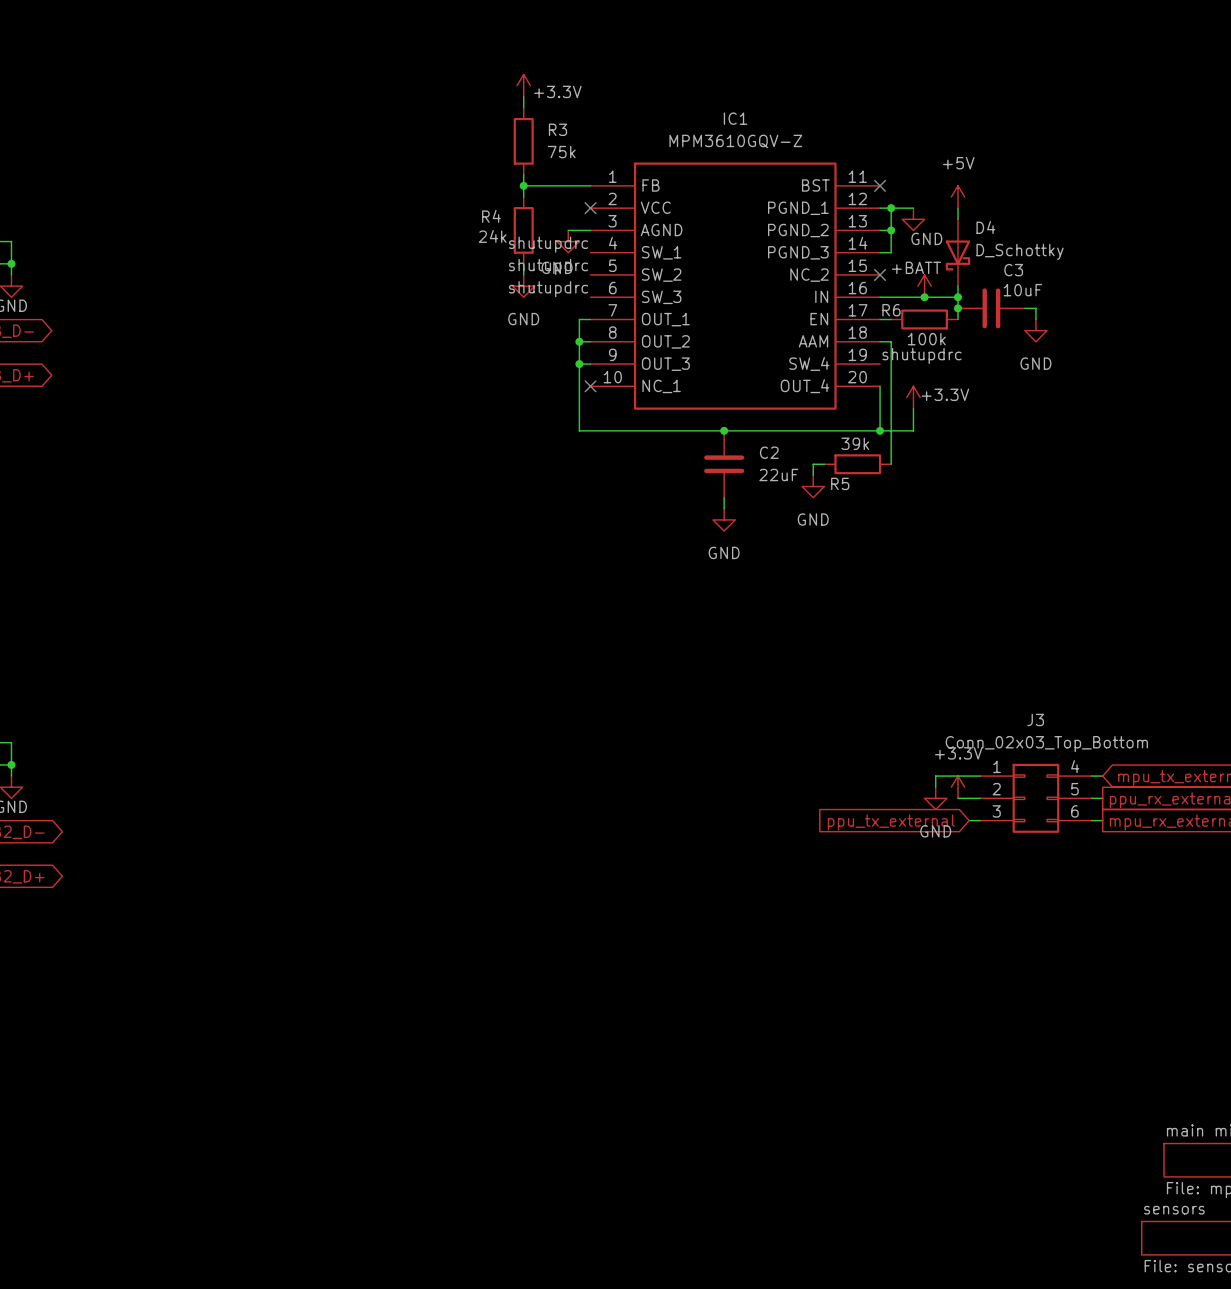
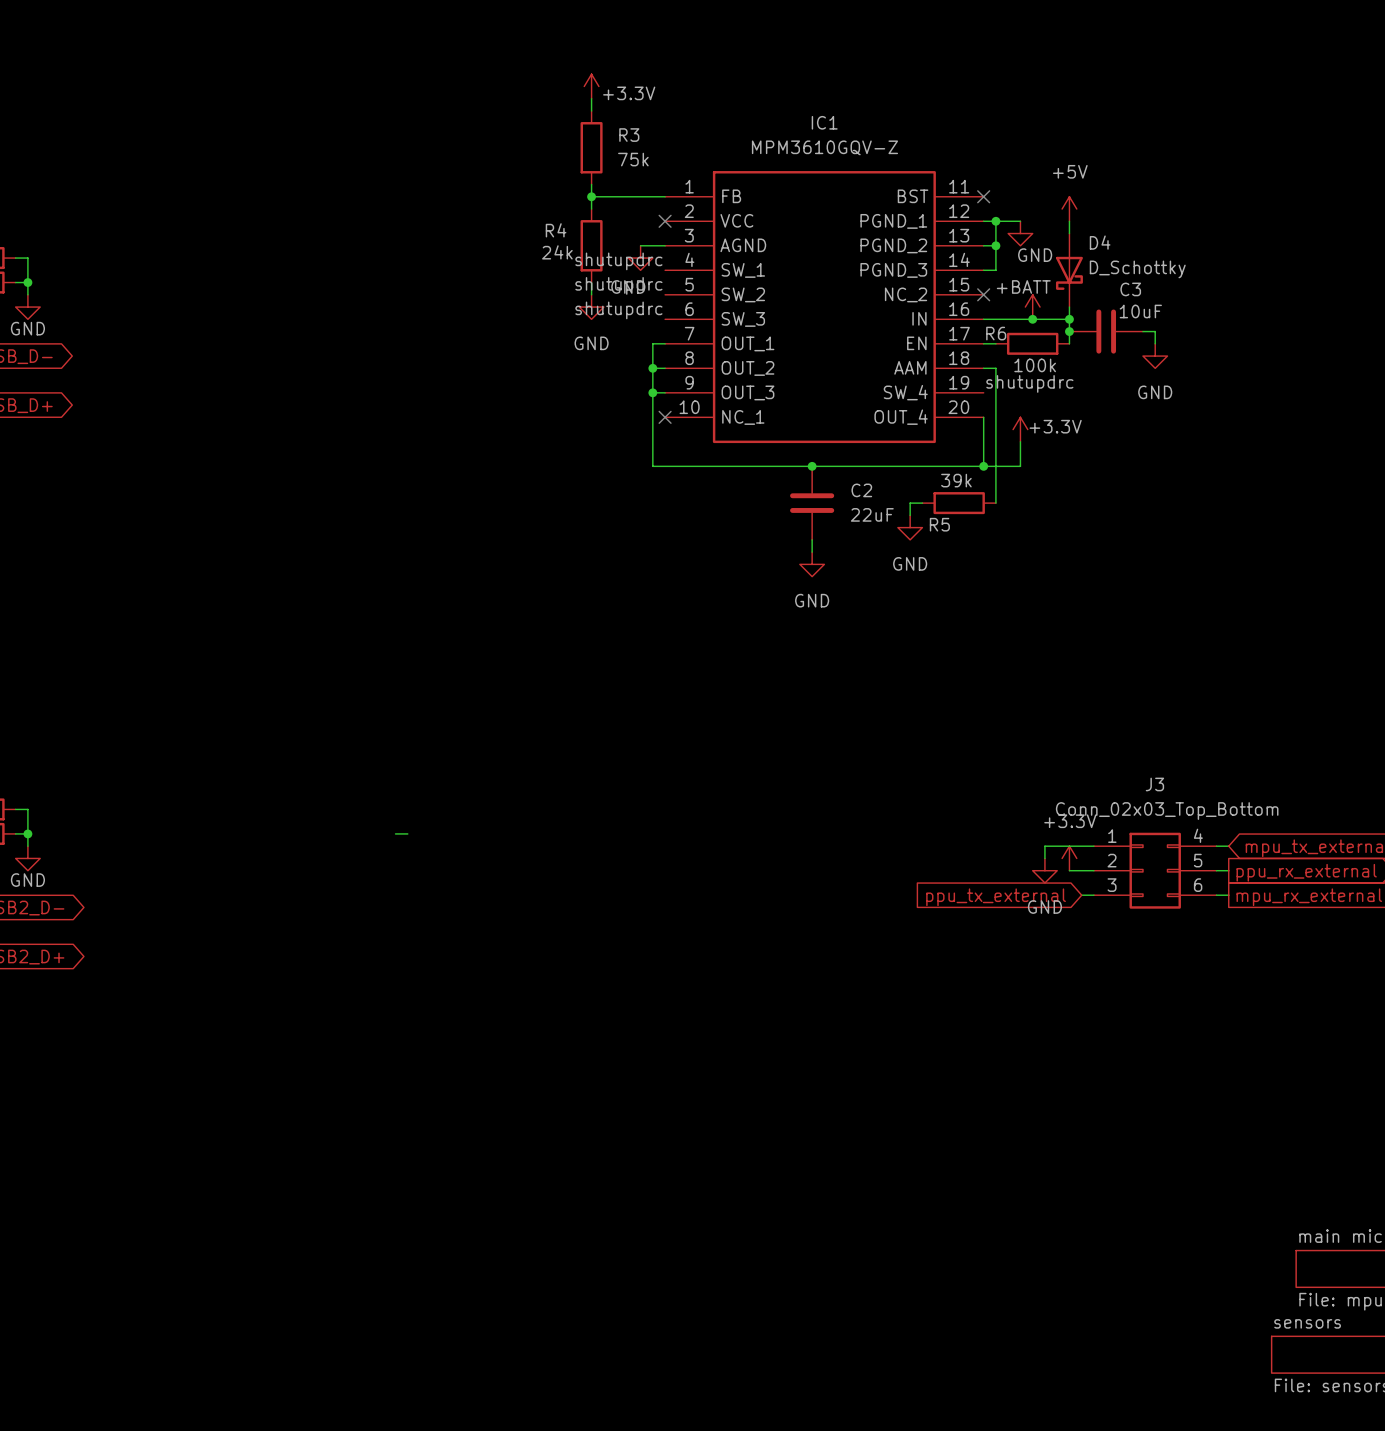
wire: none -> (395, 833) (407, 833)

